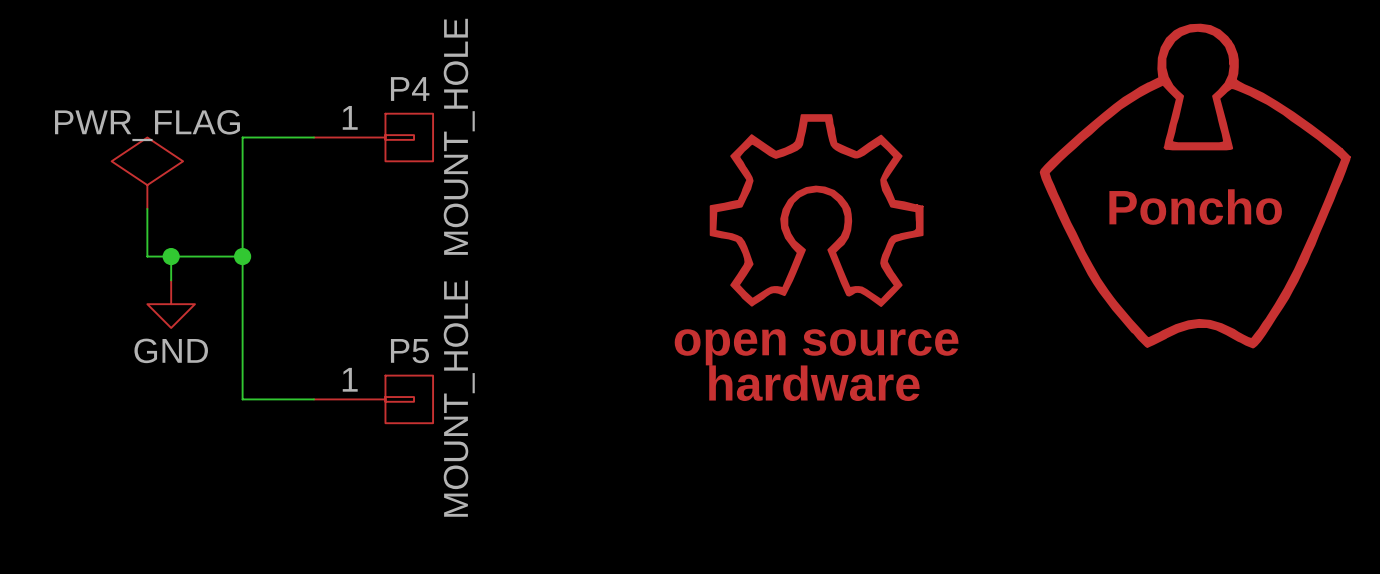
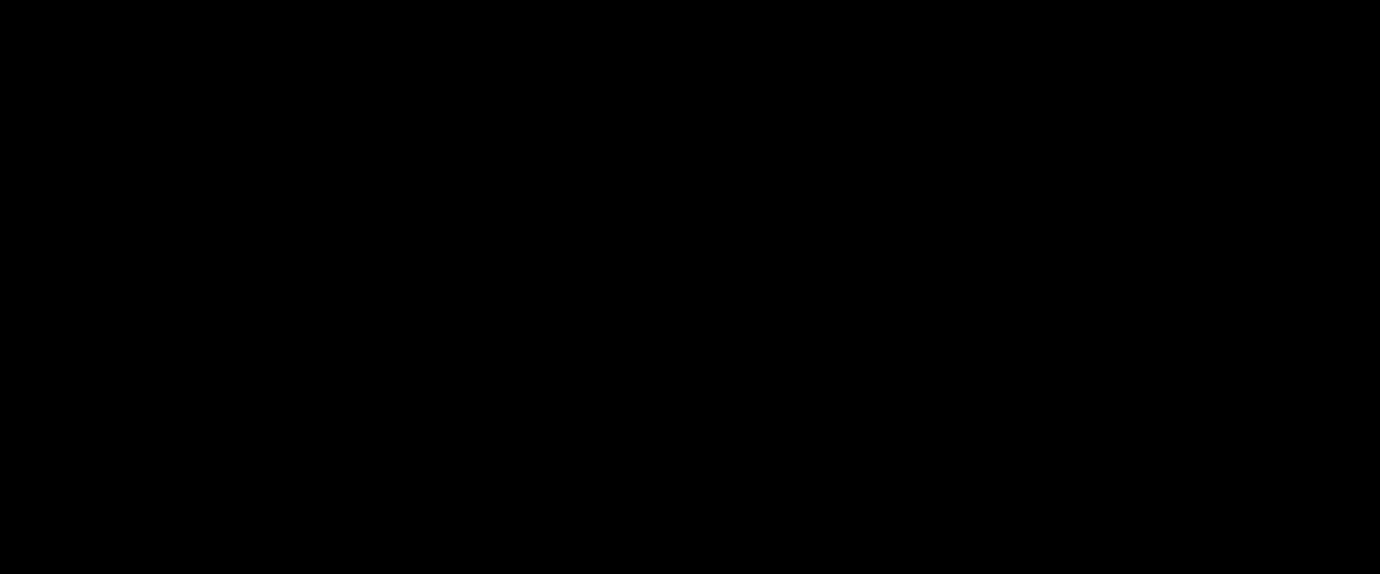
wire: (314, 137) (242, 137) (242, 399) (314, 399) -> none
P4: MOUNT_HOLE (373, 137) -> none
power symbol: PWR_FLAG (147, 173) -> none
power symbol: (1195, 186) -> none
wire: (147, 208) (147, 256) (242, 256) -> none
power symbol: (816, 210) -> none
wire: (171, 256) (171, 280) -> none
junction: (171, 256) -> none
junction: (242, 256) -> none
power symbol: GND (171, 304) -> none
P5: MOUNT_HOLE (373, 399) -> none

